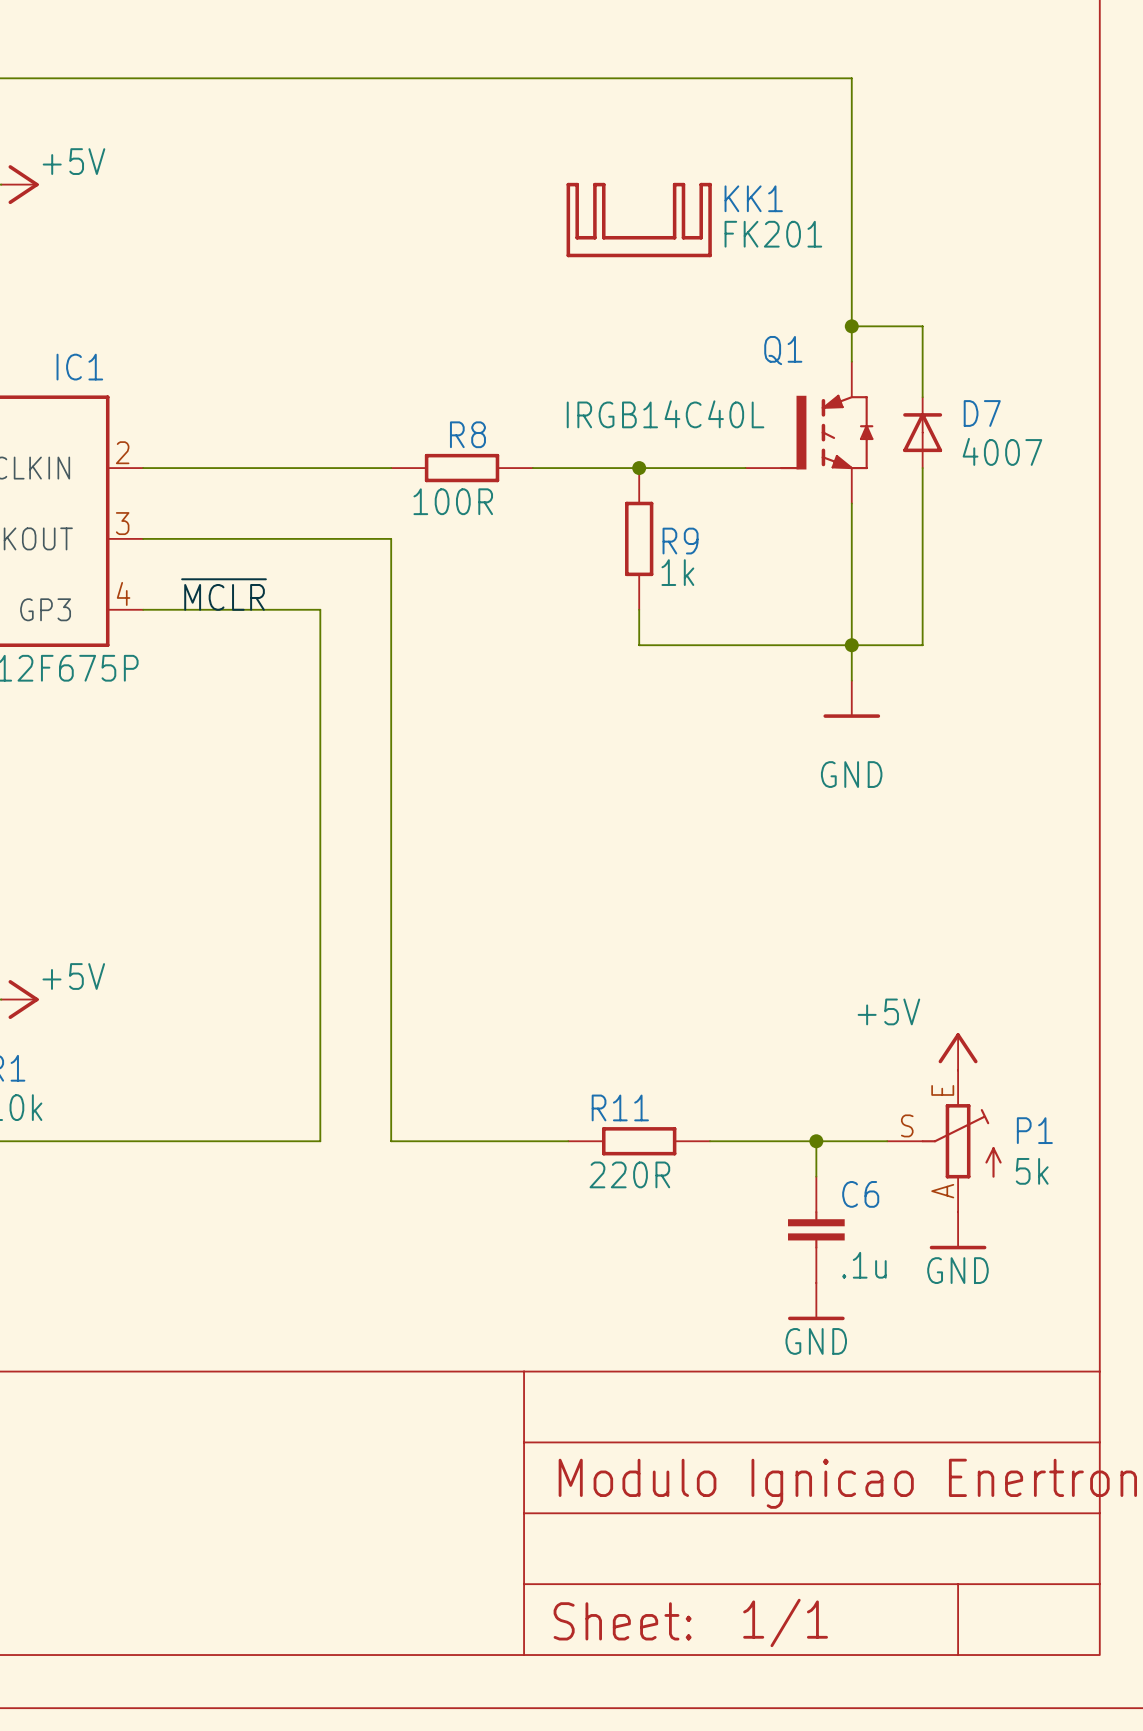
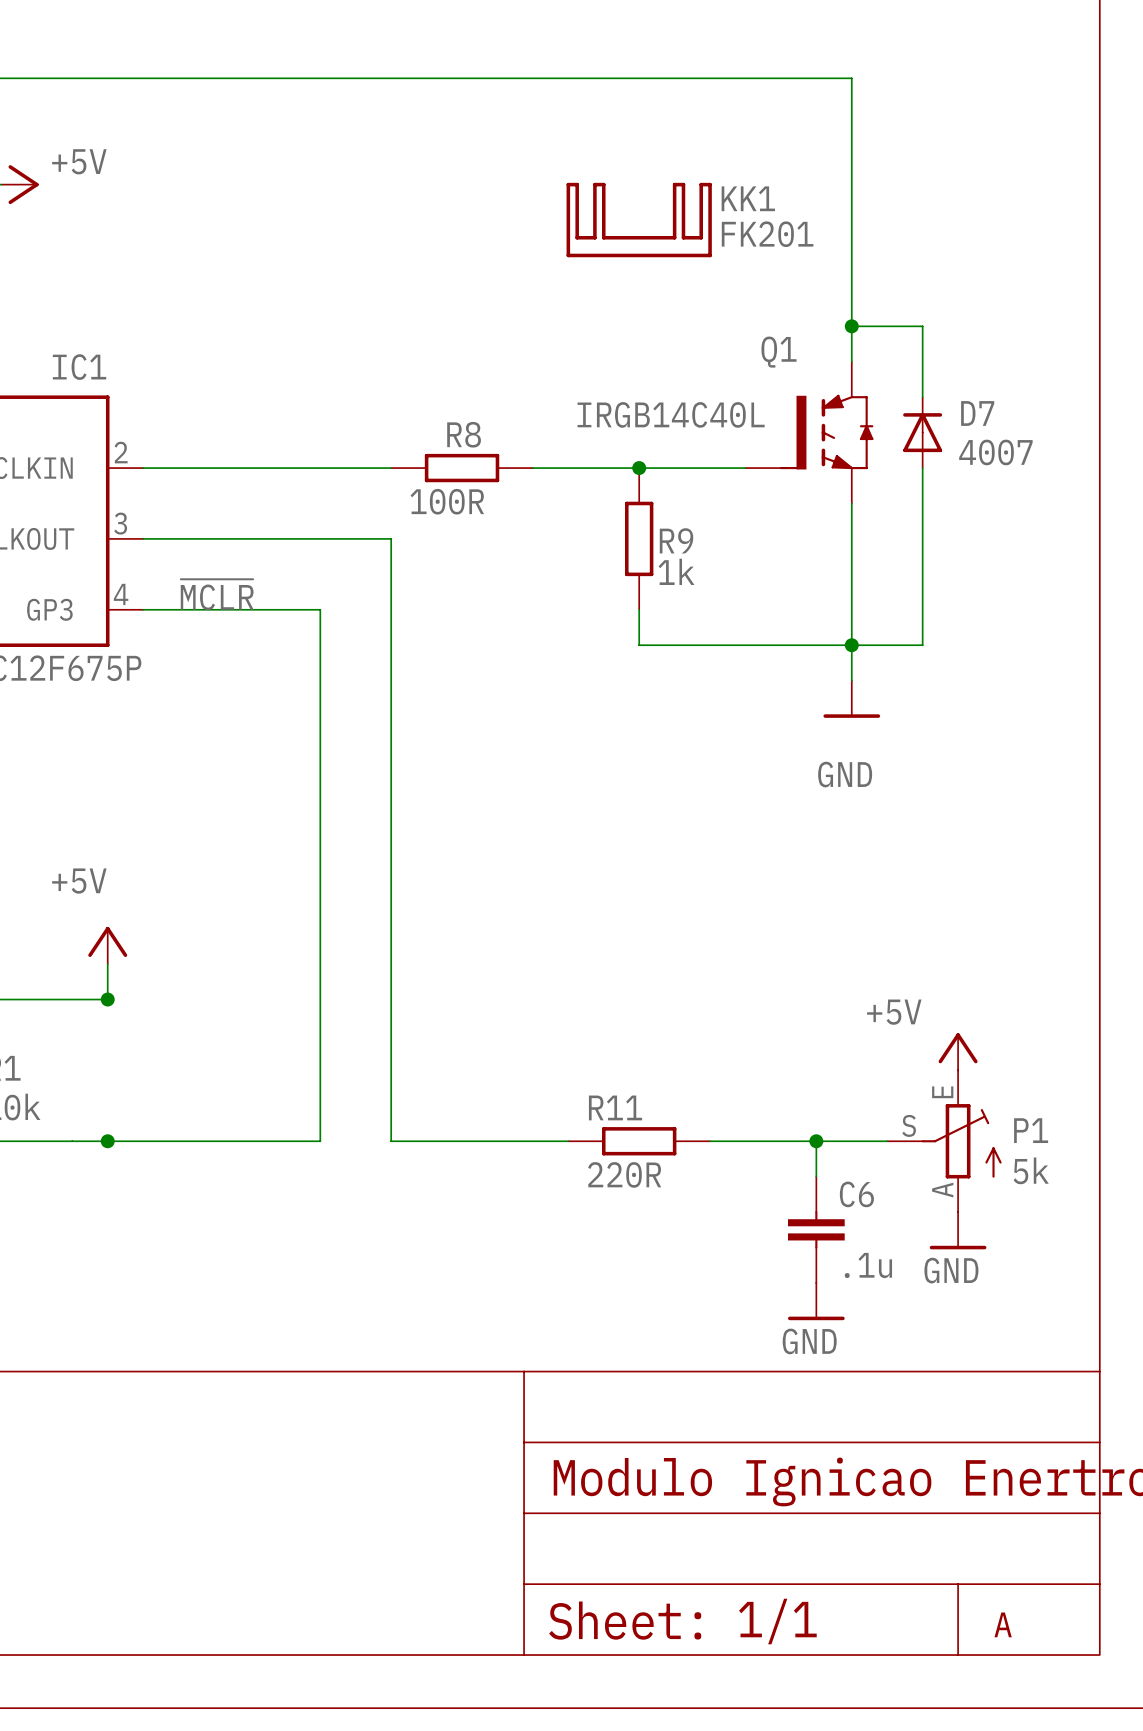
wire: none -> (107, 964) (107, 999) (1, 999)
power symbol position: +5V (20, 999) -> +5V (107, 945)
power symbol rotation: 0° (23, 999) -> 90° counterclockwise (107, 941)
junction: none -> (107, 999)
junction: none -> (107, 1141)
text: none -> A (1003, 1624)

